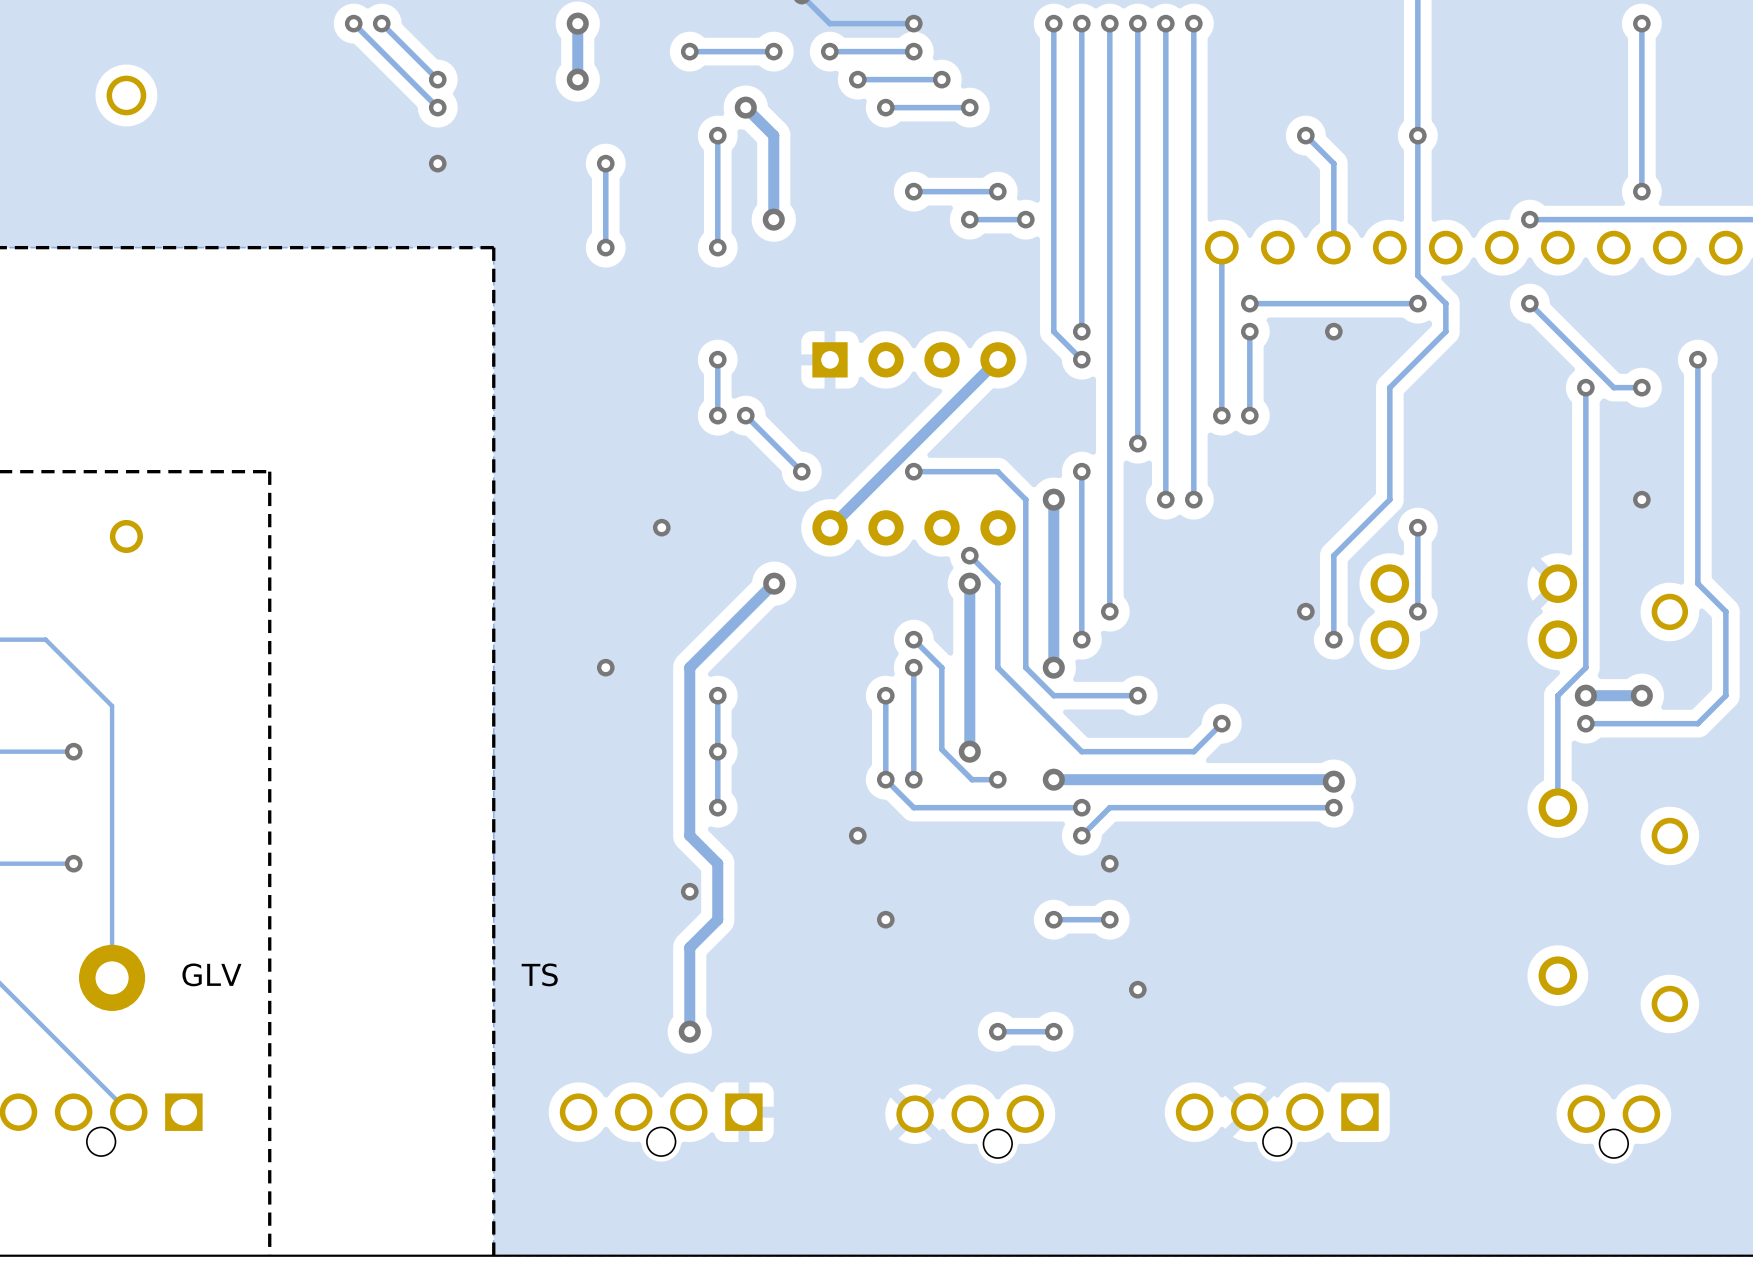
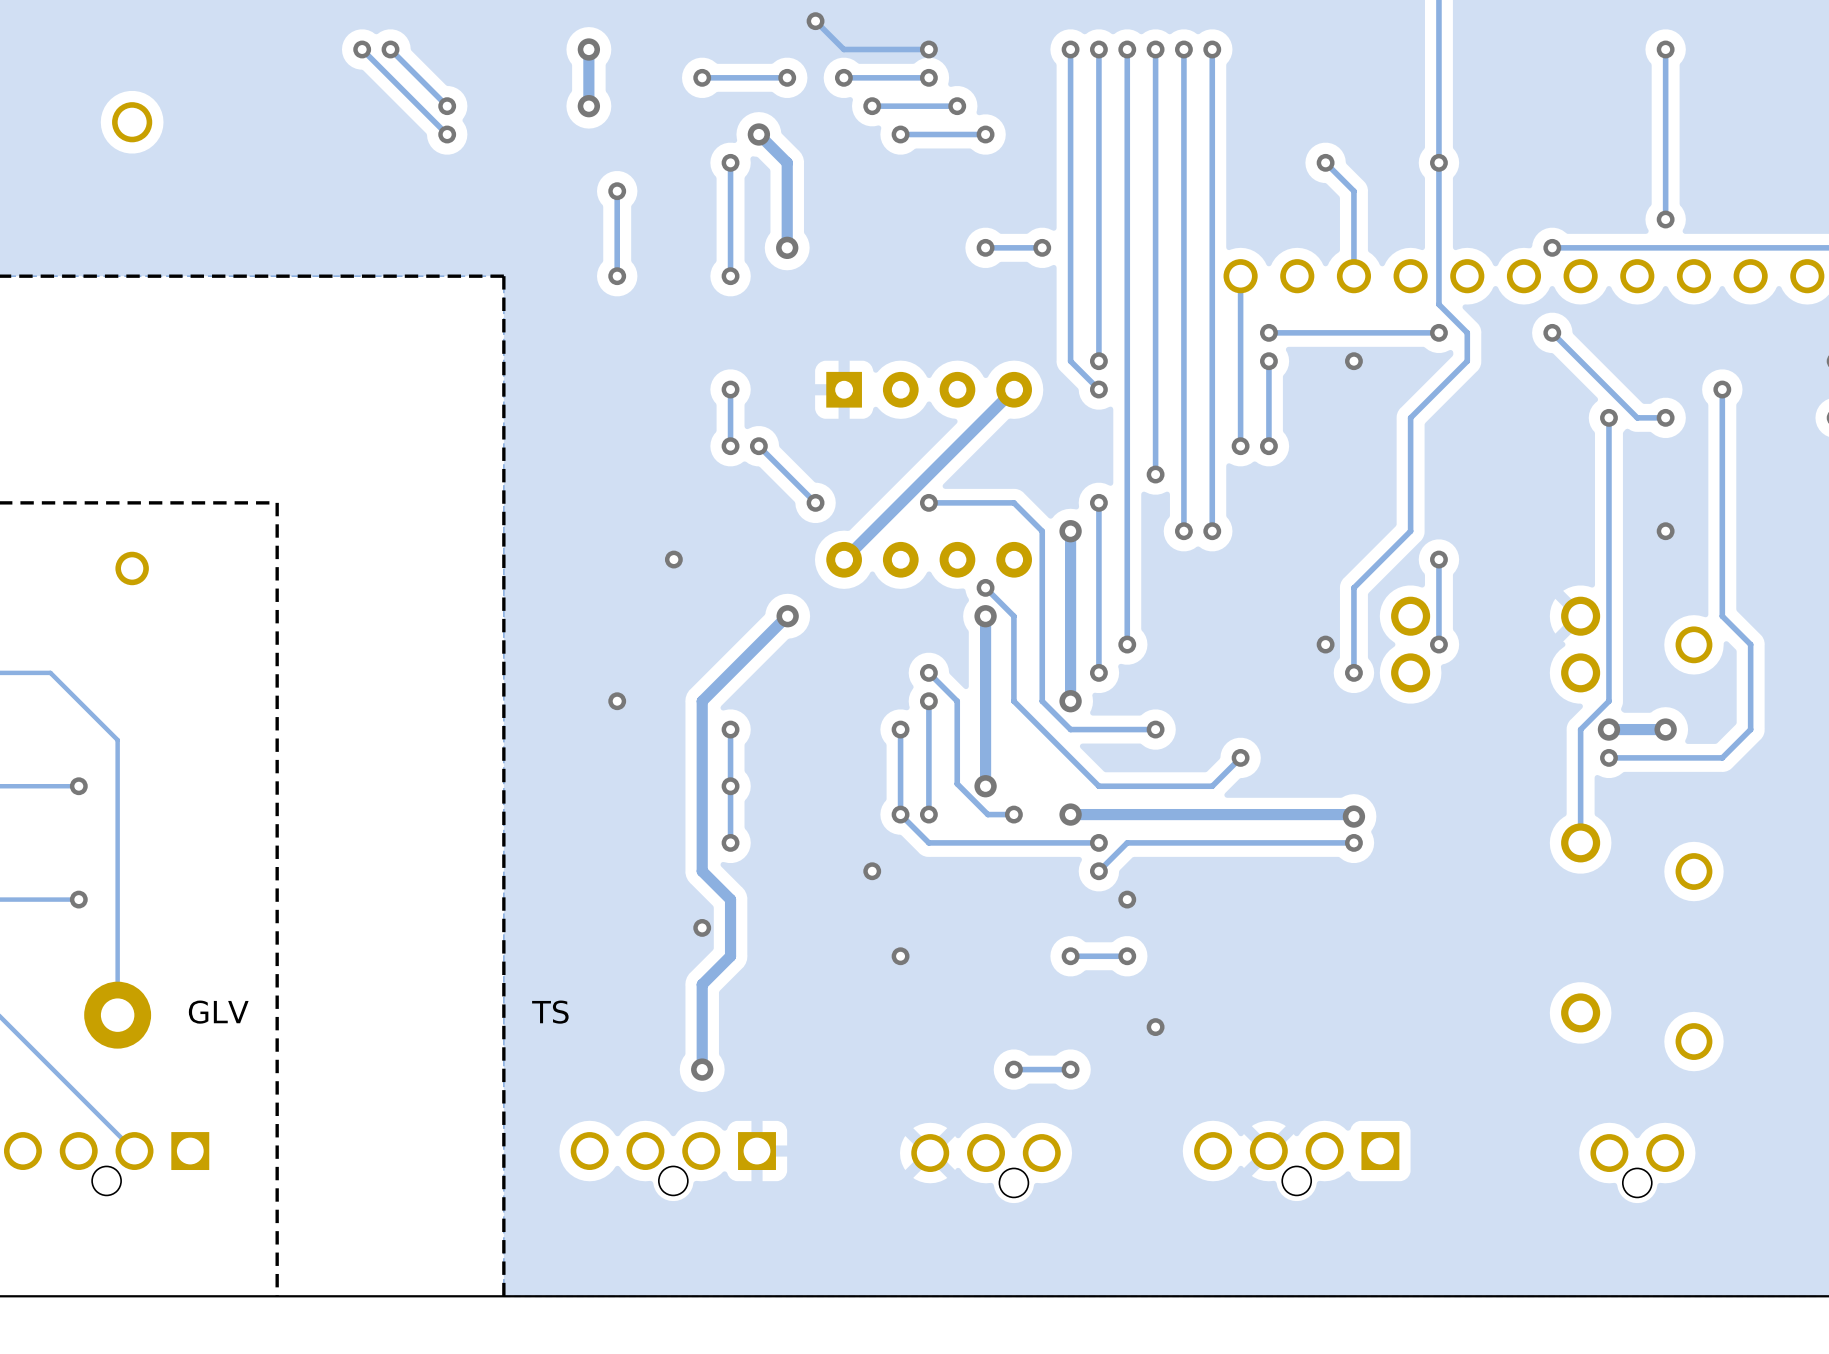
via: (437, 163) -> none
via: (913, 191) -> none
track: (997, 191) (913, 191) -> none
via: (997, 191) -> none

